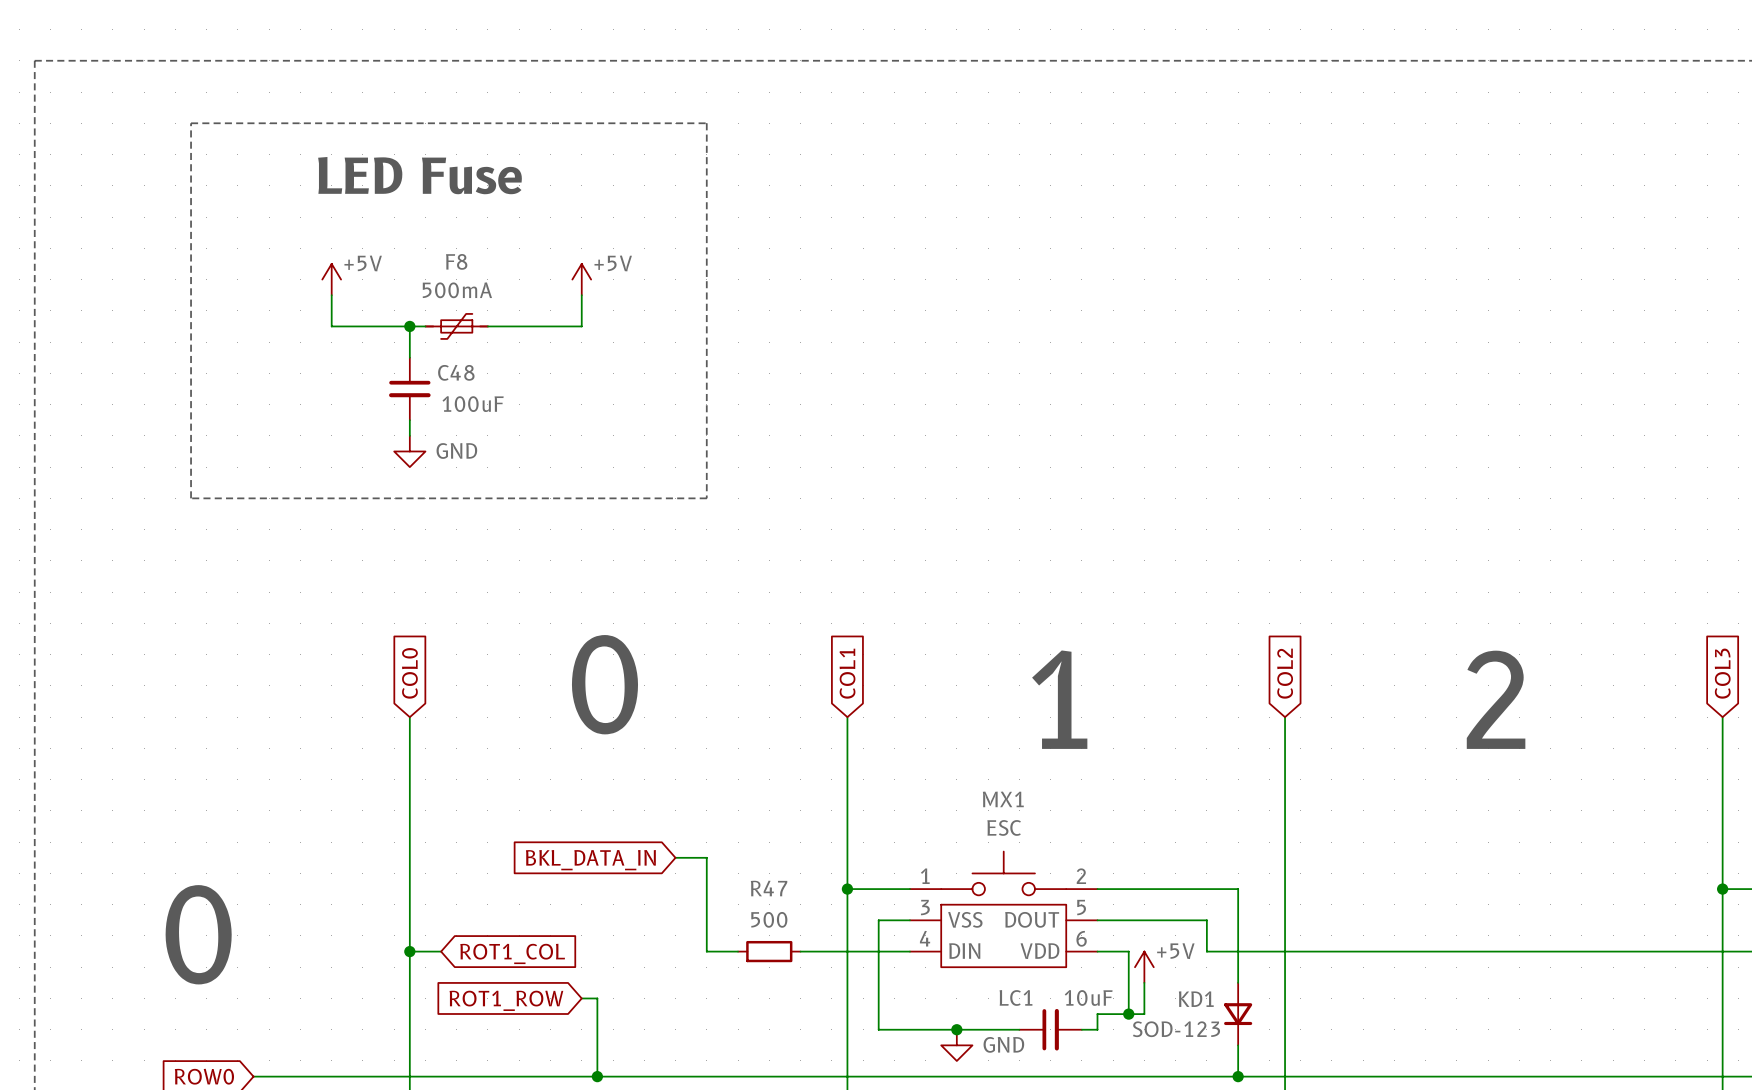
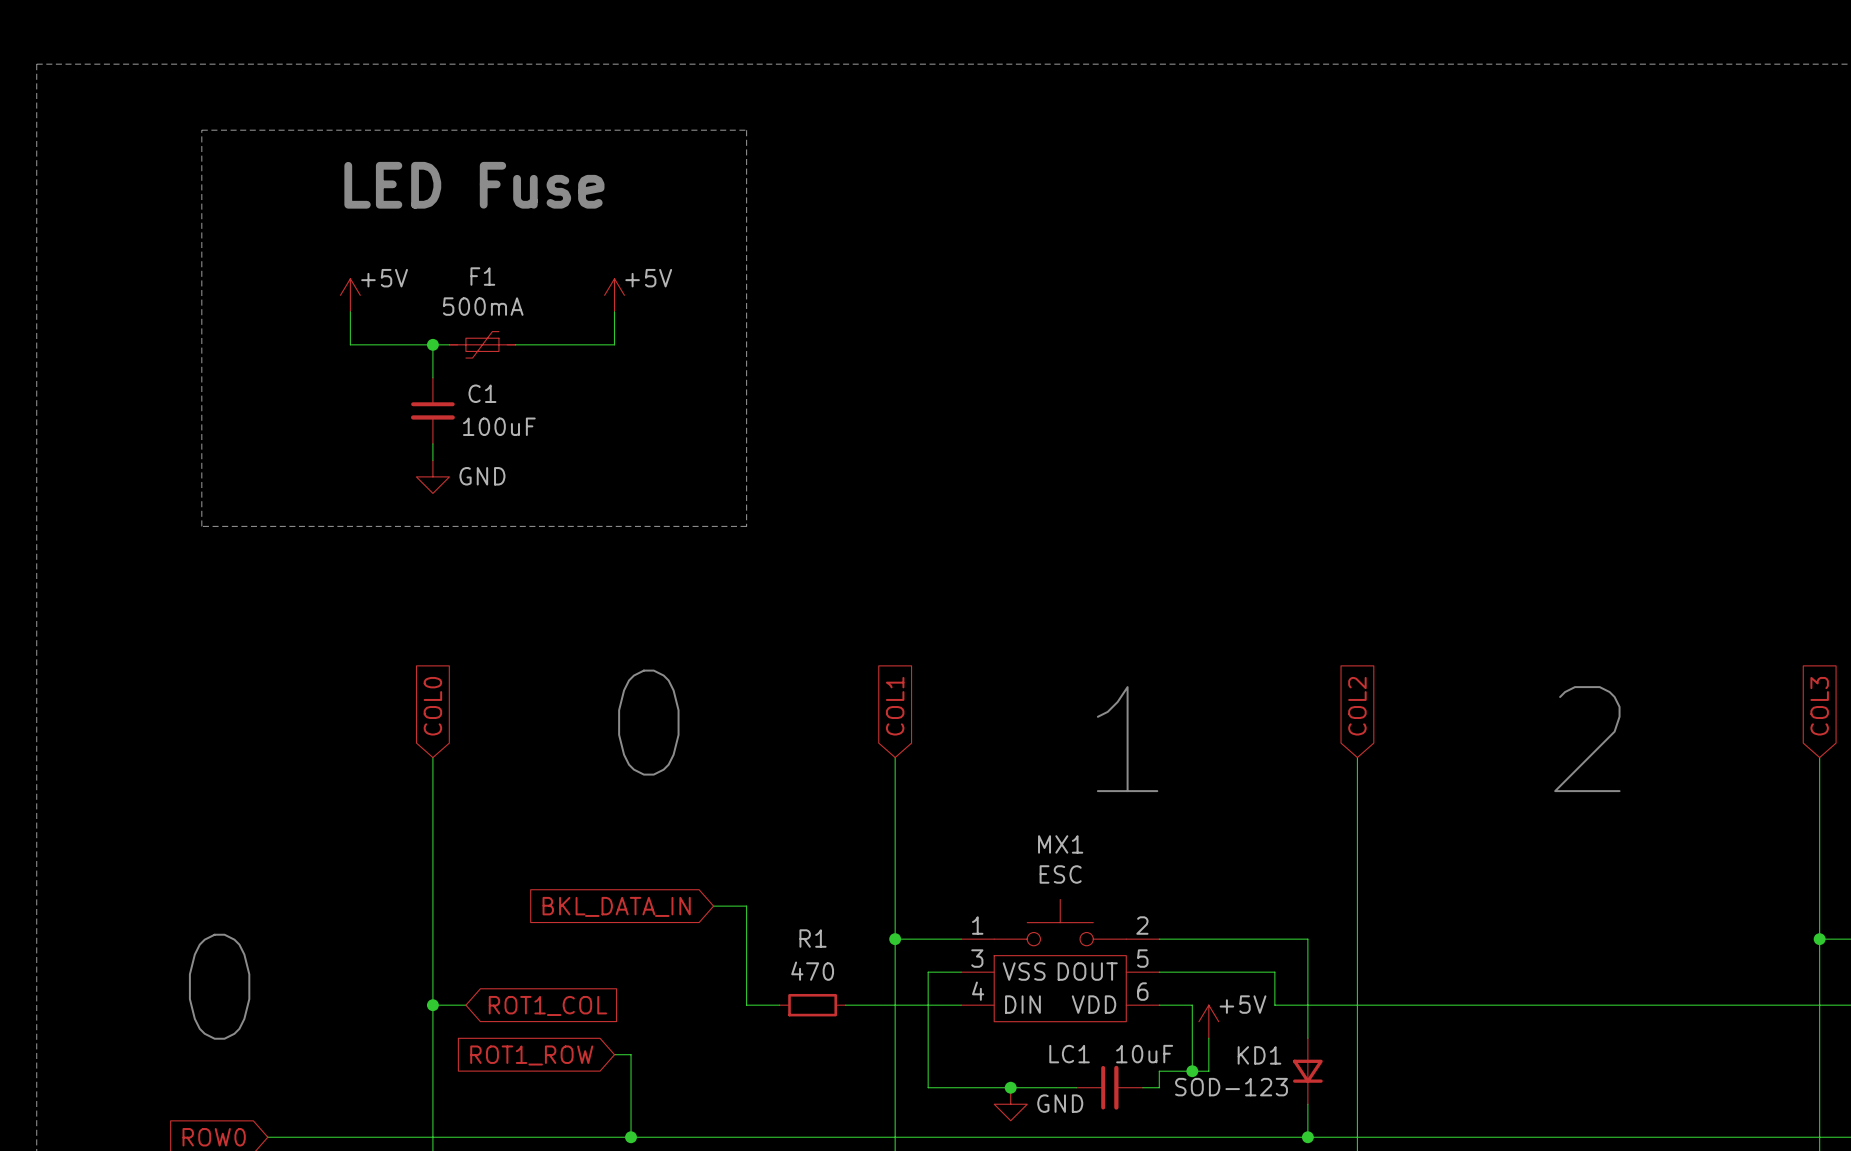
F8 name: F8 (456, 261) -> F1 (482, 276)
C48 name: C48 (456, 372) -> C1 (482, 393)
R47 name: R47 (769, 888) -> R1 (813, 938)
R47 value: 500 (769, 919) -> 470 (812, 971)

